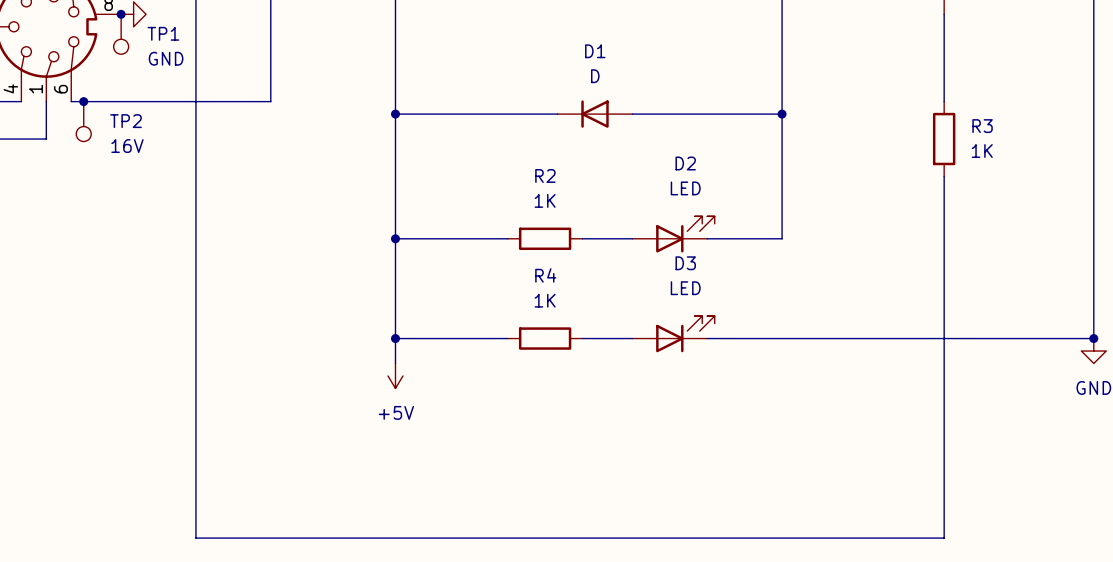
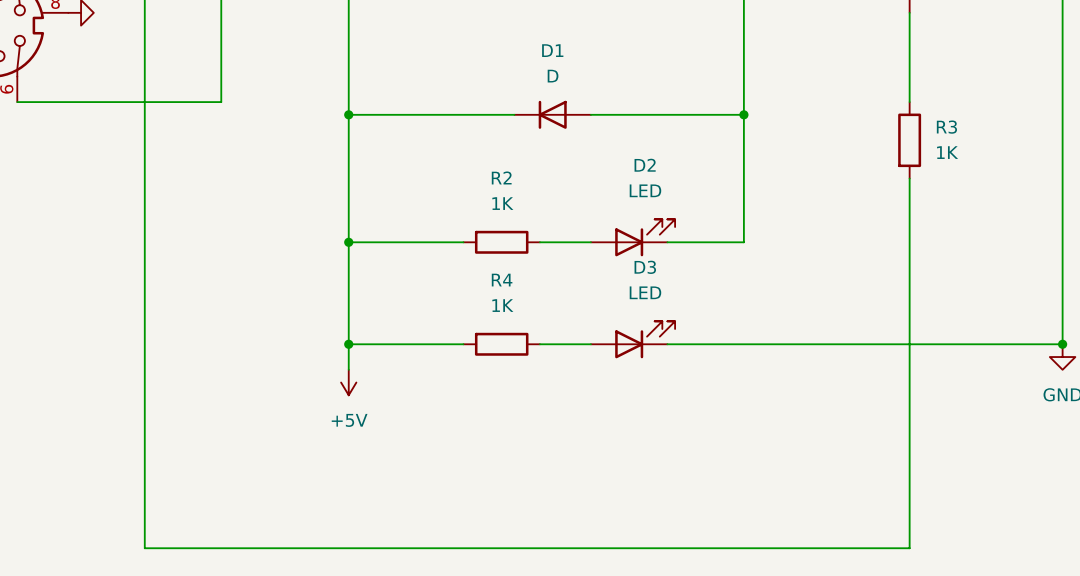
junction: (121, 14) -> none
TP1: GND (121, 34) -> none
junction: (83, 101) -> none
TP2: 16V (83, 121) -> none

